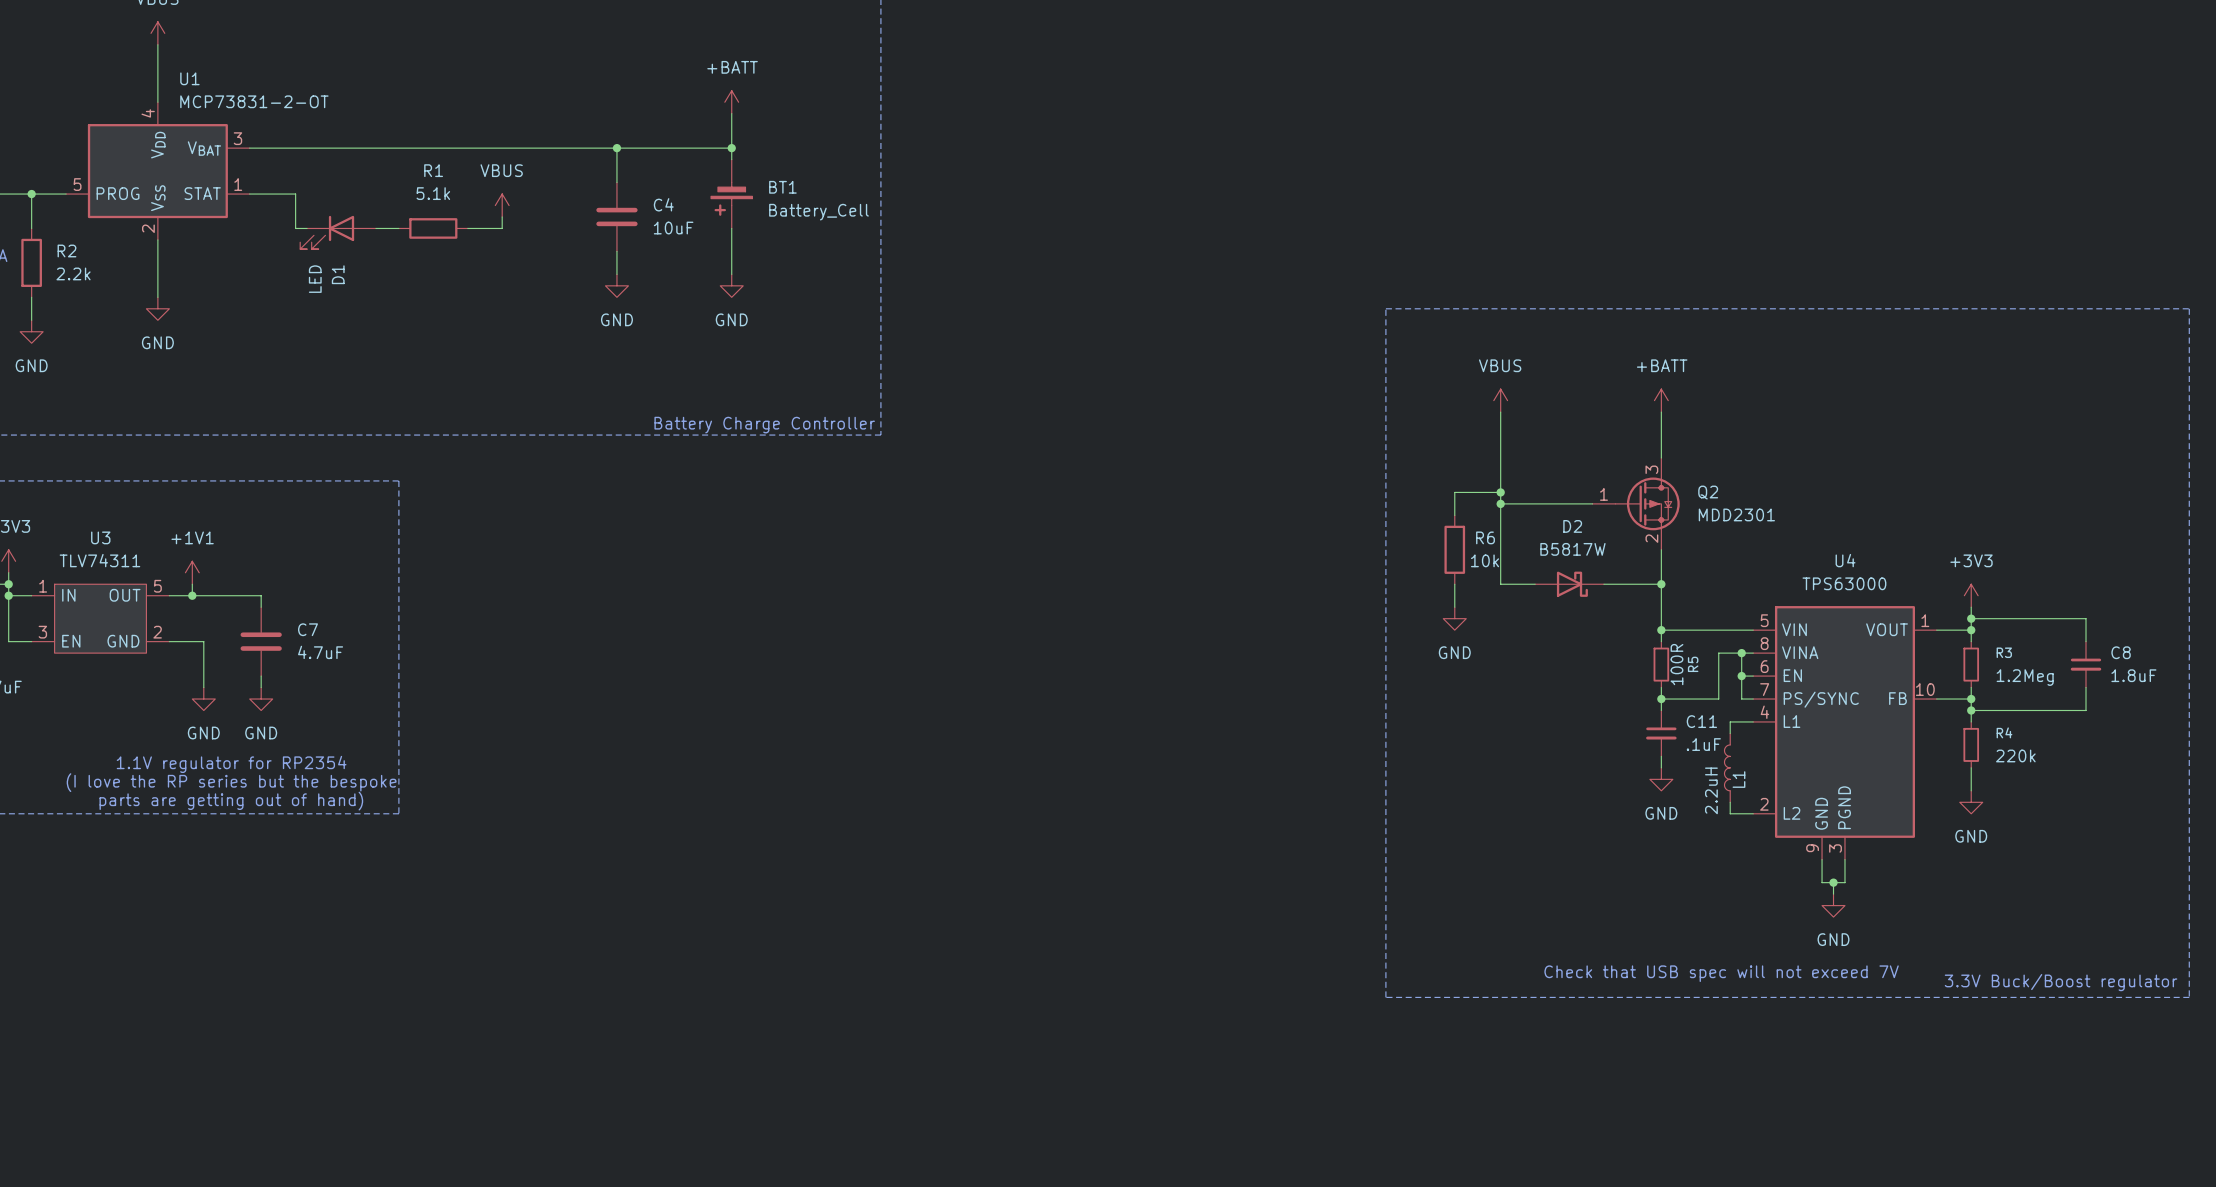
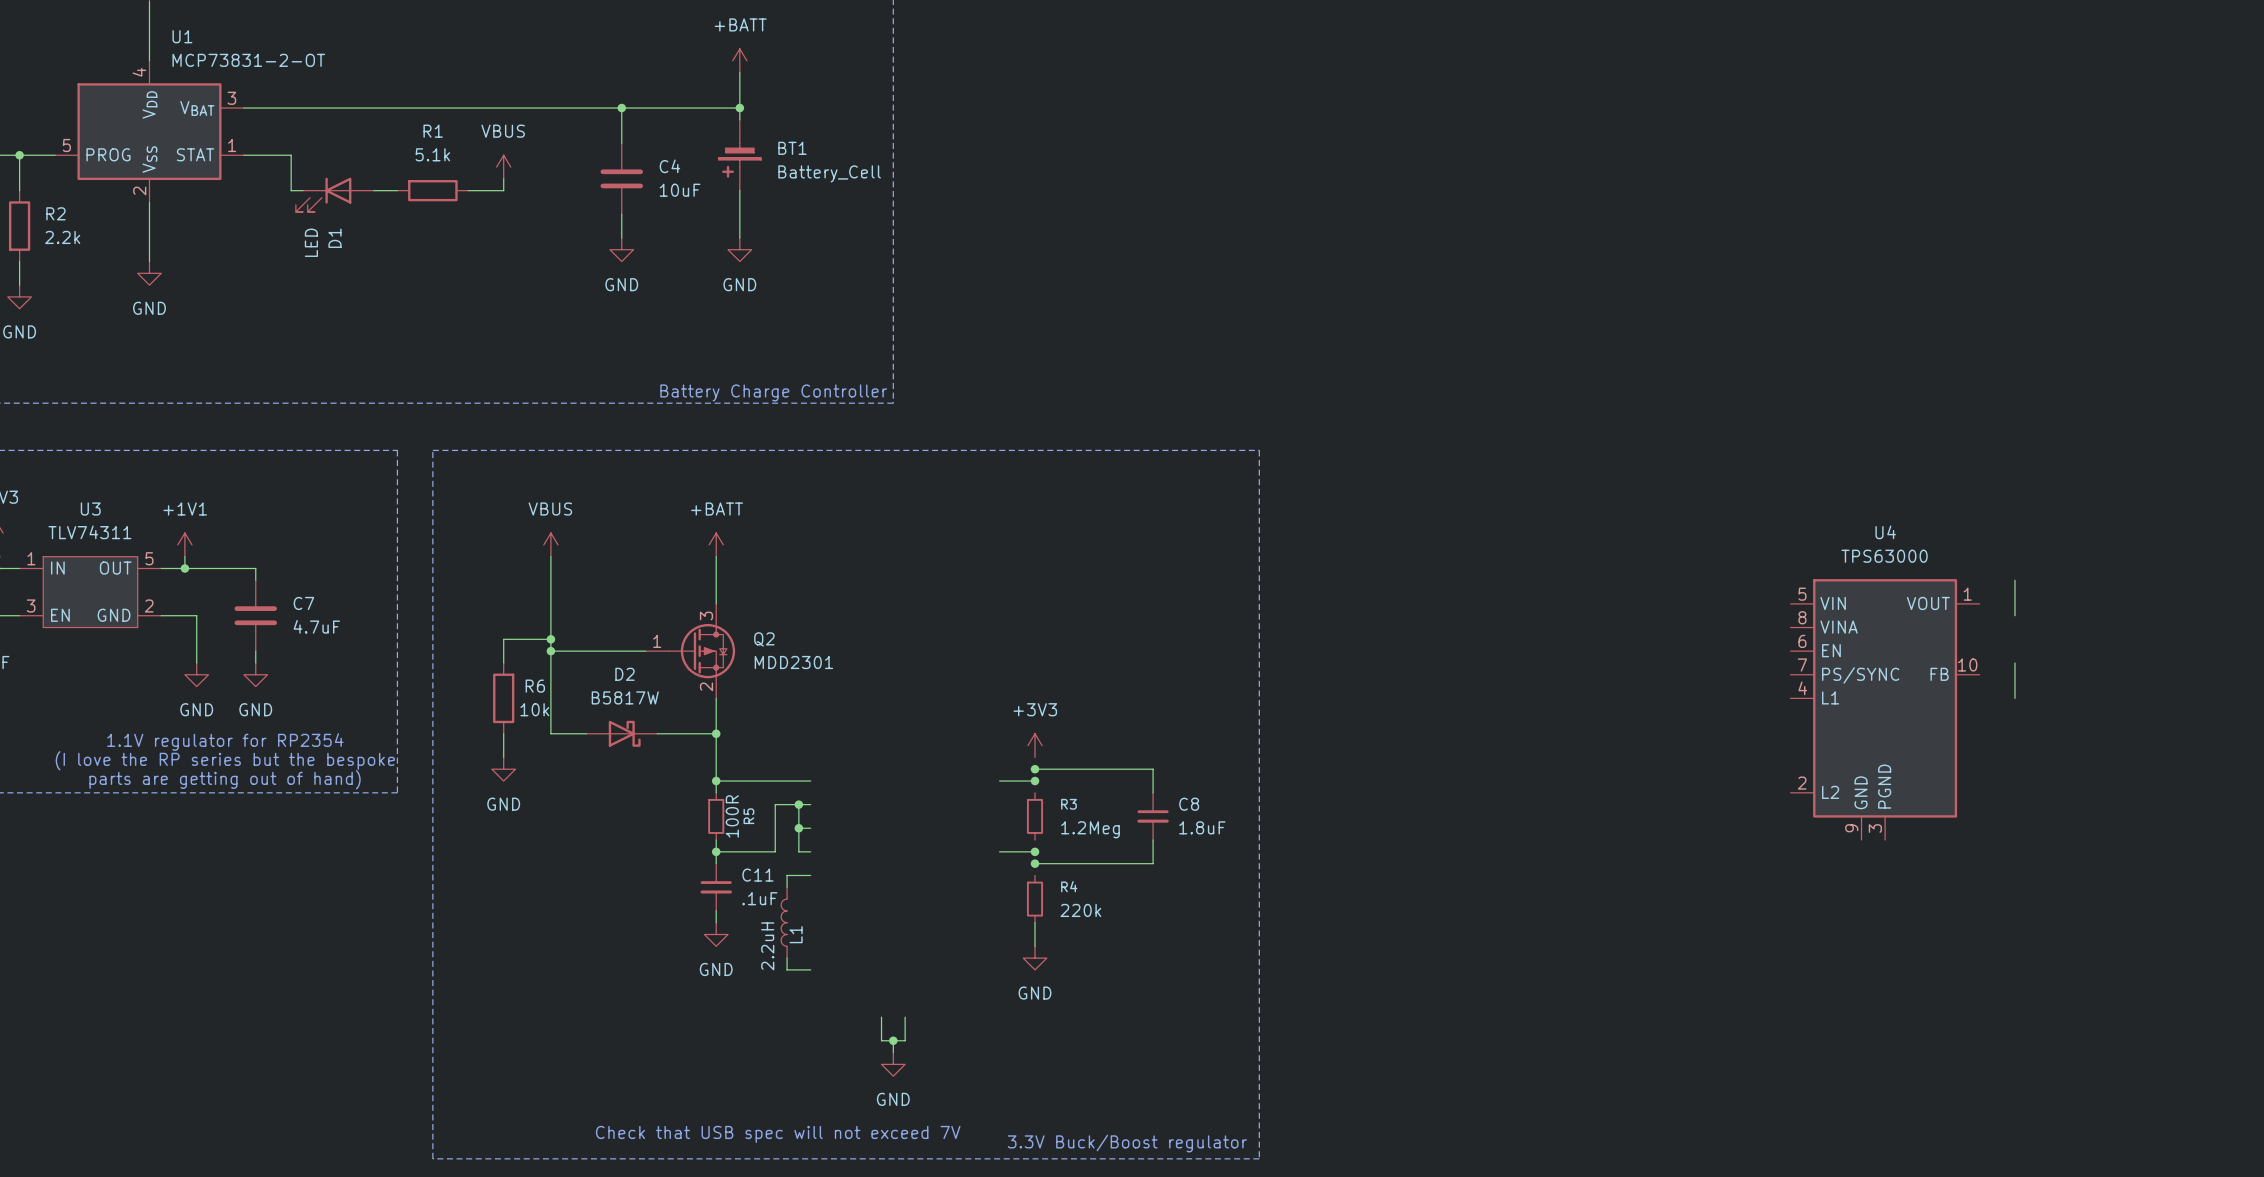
line: (1385, 308) (2189, 308) (2189, 997) (1385, 997) (1385, 308) -> none
power symbol: VBUS (1500, 400) -> none
power symbol: +BATT (1661, 400) -> none
wire: (1500, 412) (1500, 584) (1535, 584) -> none
wire: (1661, 412) (1661, 458) -> none
line: none -> (432, 450) (1259, 450) (1259, 1158) (432, 1158) (432, 450)
wire: (1500, 492) (1454, 492) (1454, 515) -> none
junction: (1500, 492) -> none
wire: (1500, 503) (1592, 503) -> none
junction: (1500, 503) -> none
Q2 position: (1636, 503) -> (690, 651)
R6 position: (1454, 549) -> (503, 698)
wire: (1661, 549) (1661, 641) -> none
power symbol: none -> VBUS (550, 544)
power symbol: none -> +BATT (716, 544)
wire: none -> (550, 556) (550, 733) (586, 733)
wire: none -> (716, 556) (716, 603)
wire: (1454, 584) (1454, 607) -> none
D2 position: (1569, 584) -> (621, 733)
wire: (1603, 584) (1661, 584) -> none
junction: (1661, 584) -> none
power symbol: +3V3 (1971, 595) -> none
power symbol: GND (1454, 618) -> none
wire: (1971, 618) (2086, 618) (2086, 641) -> none
junction: (1971, 618) -> none
wire: (1661, 630) (1753, 630) -> none
junction: (1661, 630) -> none
wire: (1936, 630) (1971, 630) -> none
junction: (1971, 630) -> none
wire: (1741, 653) (1741, 699) (1753, 699) -> none
junction: (1741, 653) -> none
wire: (1753, 653) (1718, 653) (1718, 699) (1661, 699) -> none
wire: none -> (550, 639) (503, 639) (503, 662)
junction: none -> (550, 639)
R5 position: (1661, 664) -> (716, 816)
R3 position: (1971, 664) -> (1035, 816)
C8 position: (2086, 664) -> (1153, 816)
wire: none -> (550, 651) (645, 651)
junction: none -> (550, 651)
wire: (1741, 676) (1753, 676) -> none
junction: (1741, 676) -> none
wire: (1661, 687) (1661, 710) -> none
wire: (2086, 687) (2086, 710) (1971, 710) -> none
junction: (1661, 699) -> none
wire: (1936, 699) (1971, 699) -> none
junction: (1971, 699) -> none
junction: (1971, 710) -> none
wire: none -> (716, 698) (716, 792)
wire: (1753, 721) (1730, 721) (1730, 733) -> none
C11 position: (1661, 733) -> (716, 887)
R4 position: (1971, 744) -> (1035, 899)
wire: none -> (503, 733) (503, 757)
wire: none -> (657, 733) (716, 733)
junction: none -> (716, 733)
wire: (1661, 756) (1661, 767) -> none
power symbol: none -> +3V3 (1035, 745)
L1 position: (1727, 767) -> (784, 922)
wire: (1971, 767) (1971, 790) -> none
power symbol: GND (1661, 779) -> none
power symbol: none -> GND (503, 769)
wire: none -> (1035, 769) (1153, 769) (1153, 792)
junction: none -> (1035, 769)
wire: none -> (716, 781) (810, 781)
junction: none -> (716, 781)
wire: none -> (999, 781) (1035, 781)
junction: none -> (1035, 781)
wire: (1730, 802) (1730, 813) (1753, 813) -> none
power symbol: GND (1971, 802) -> none
wire: none -> (798, 804) (798, 851) (810, 851)
junction: none -> (798, 804)
wire: none -> (810, 804) (775, 804) (775, 851) (716, 851)
wire: none -> (798, 828) (810, 828)
junction: none -> (798, 828)
wire: none -> (716, 840) (716, 863)
wire: none -> (1153, 840) (1153, 863) (1035, 863)
wire: (1822, 859) (1822, 882) (1844, 882) (1844, 859) -> none
junction: none -> (716, 851)
wire: none -> (999, 851) (1035, 851)
junction: none -> (1035, 851)
junction: none -> (1035, 863)
wire: (1833, 882) (1833, 894) -> none
junction: (1833, 882) -> none
wire: none -> (810, 875) (787, 875) (787, 887)
power symbol: GND (1833, 905) -> none
wire: none -> (716, 910) (716, 922)
wire: none -> (1035, 922) (1035, 946)
power symbol: none -> GND (716, 934)
text: Check that USB spec will not exceed 7V (1721, 973) -> none
wire: none -> (787, 958) (787, 969) (810, 969)
power symbol: none -> GND (1035, 958)
text: 3.3V Buck/Boost regulator (2061, 982) -> none
wire: none -> (881, 1017) (881, 1040) (905, 1040) (905, 1017)
wire: none -> (893, 1040) (893, 1052)
junction: none -> (893, 1040)
power symbol: none -> GND (893, 1064)
text: none -> Check that USB spec will not exceed 7V (778, 1134)
text: none -> 3.3V Buck/Boost regulator (1127, 1143)

